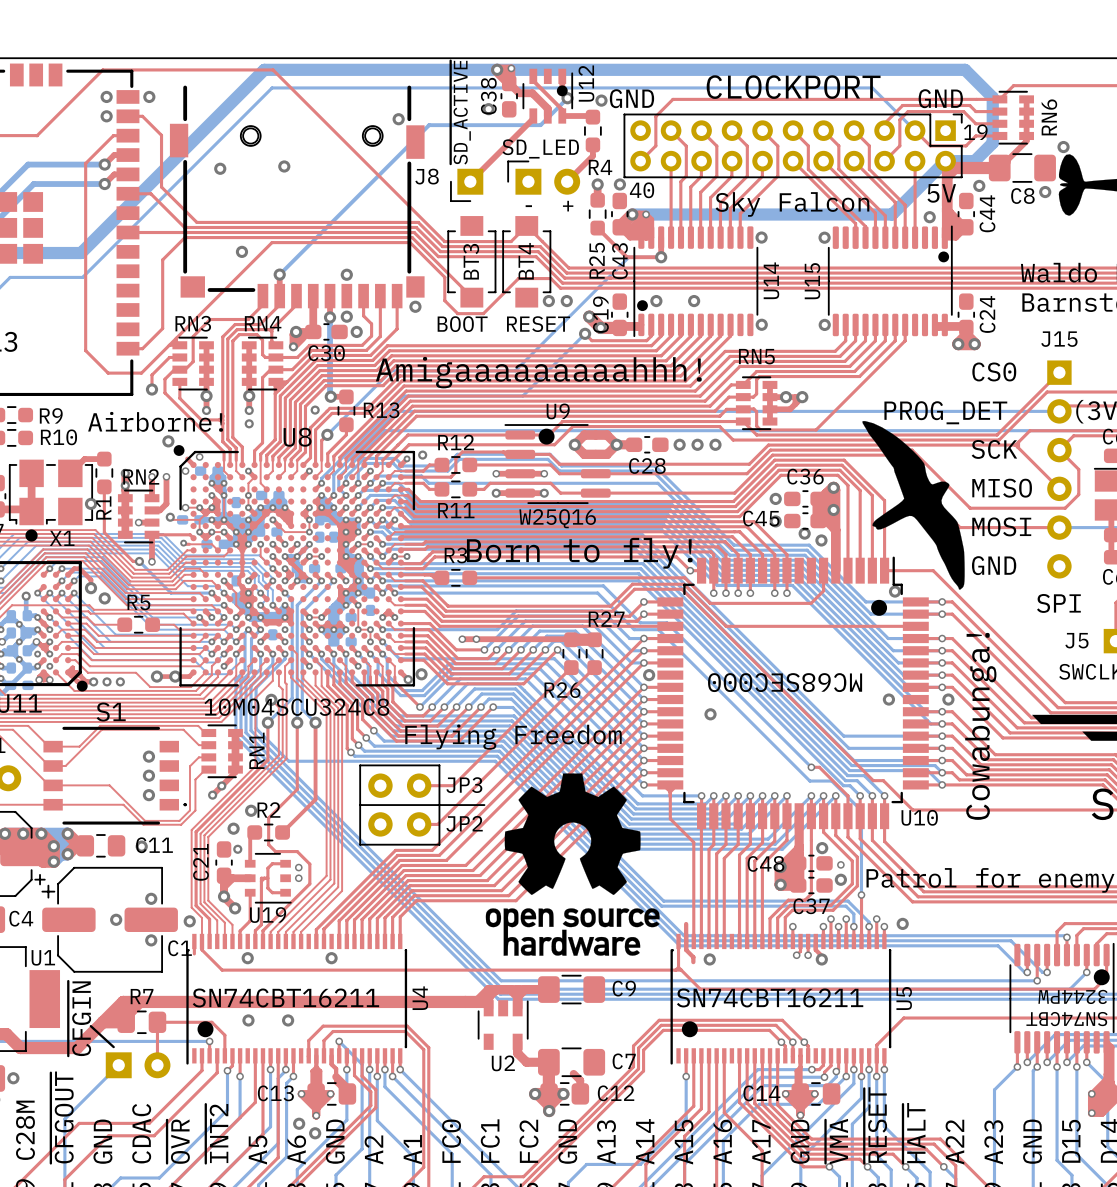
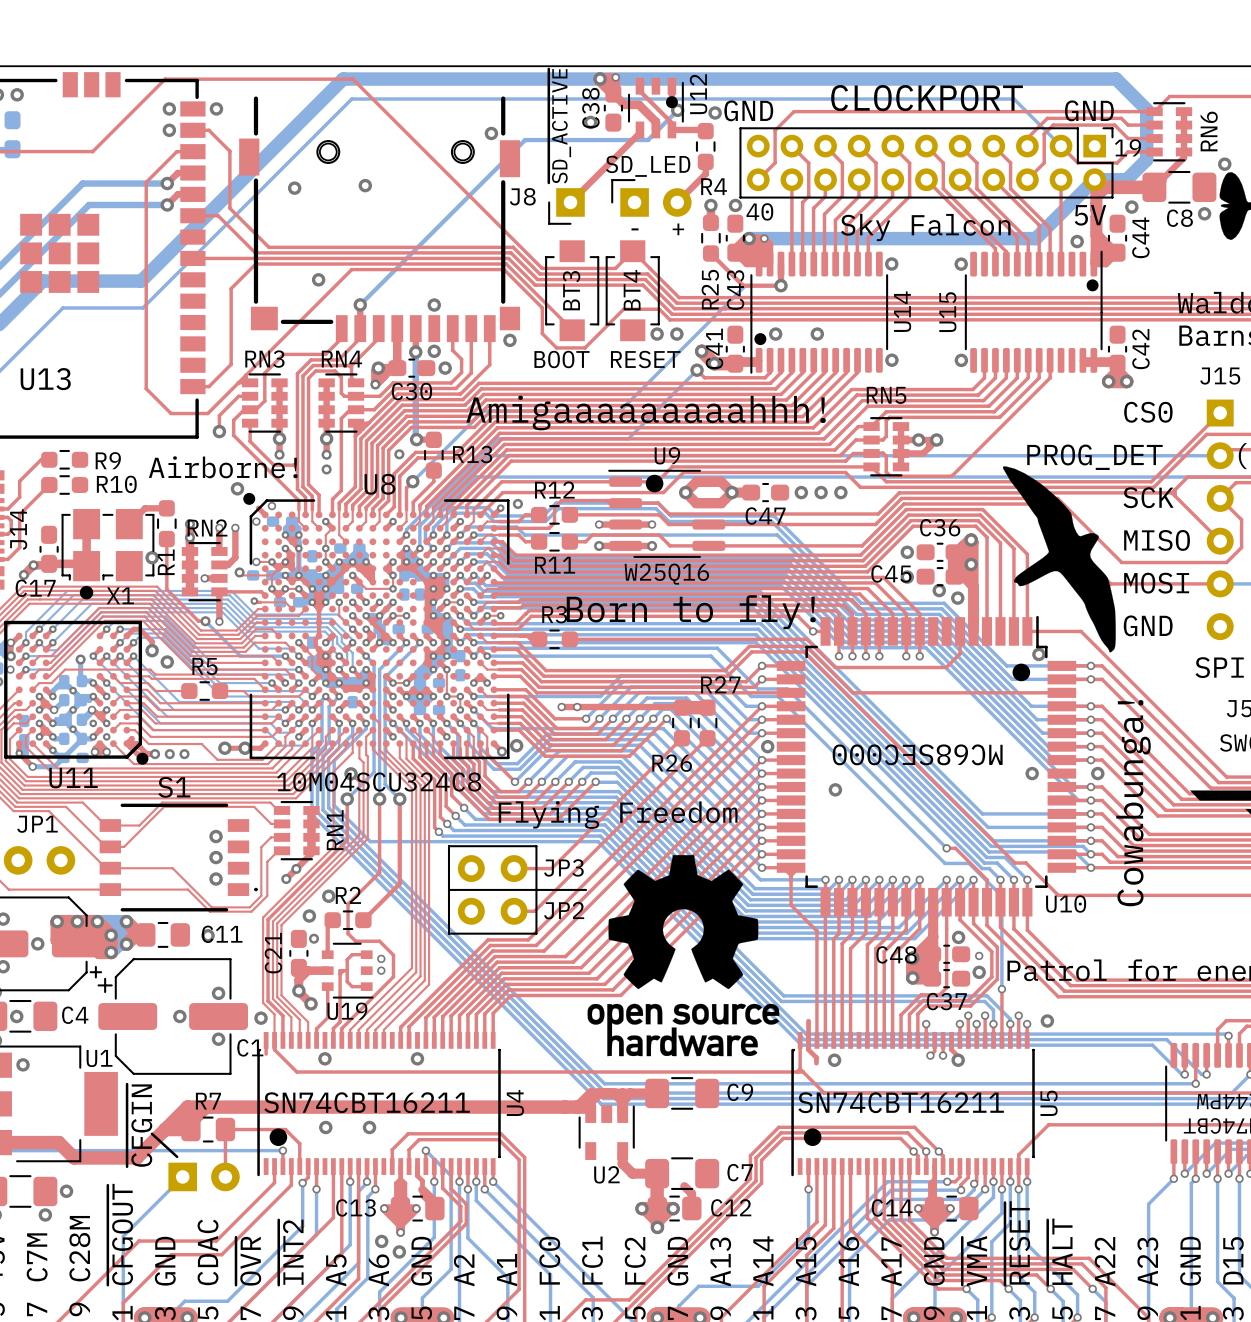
C19 name: C19 (600, 314) -> C41 (714, 348)
C24 name: C24 (987, 314) -> C42 (1140, 349)
C28 name: C28 (647, 466) -> C47 (765, 516)

